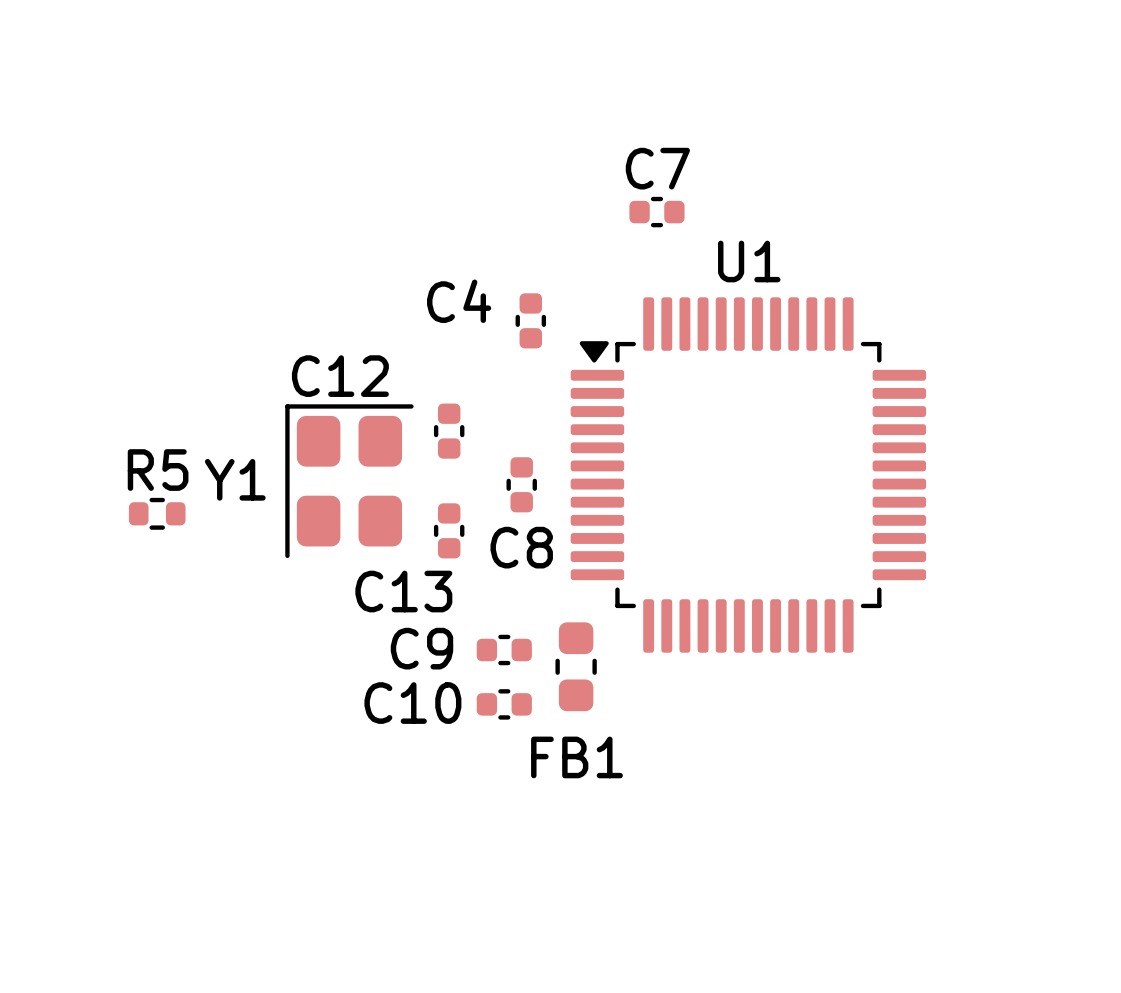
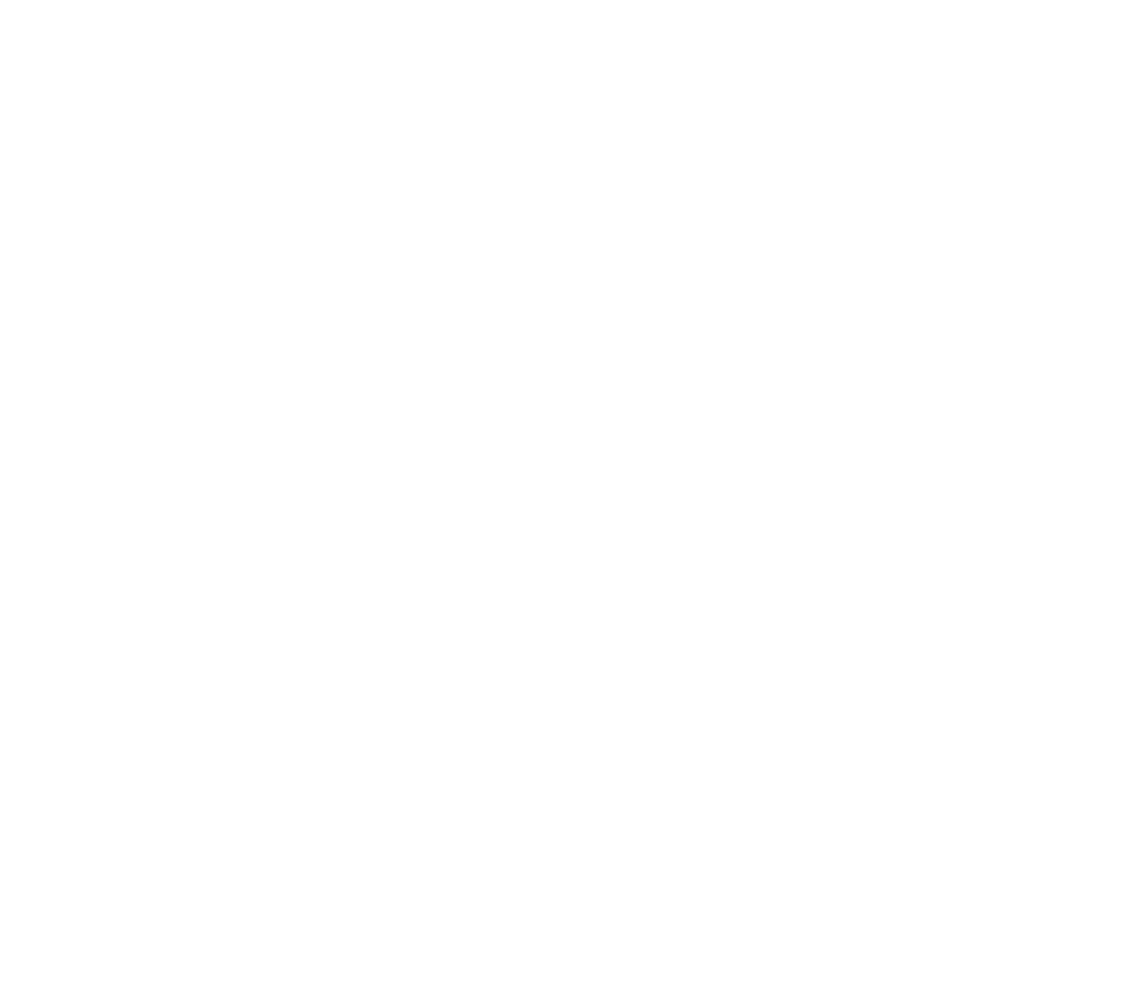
C7: (656, 212) -> none
C4: (530, 320) -> none
C12: (449, 431) -> none
U1: (748, 475) -> none
Y1: (349, 481) -> none
C8: (521, 484) -> none
R5: (157, 513) -> none
C13: (449, 530) -> none
C9: (504, 650) -> none
FB1: (576, 666) -> none
C10: (504, 704) -> none

